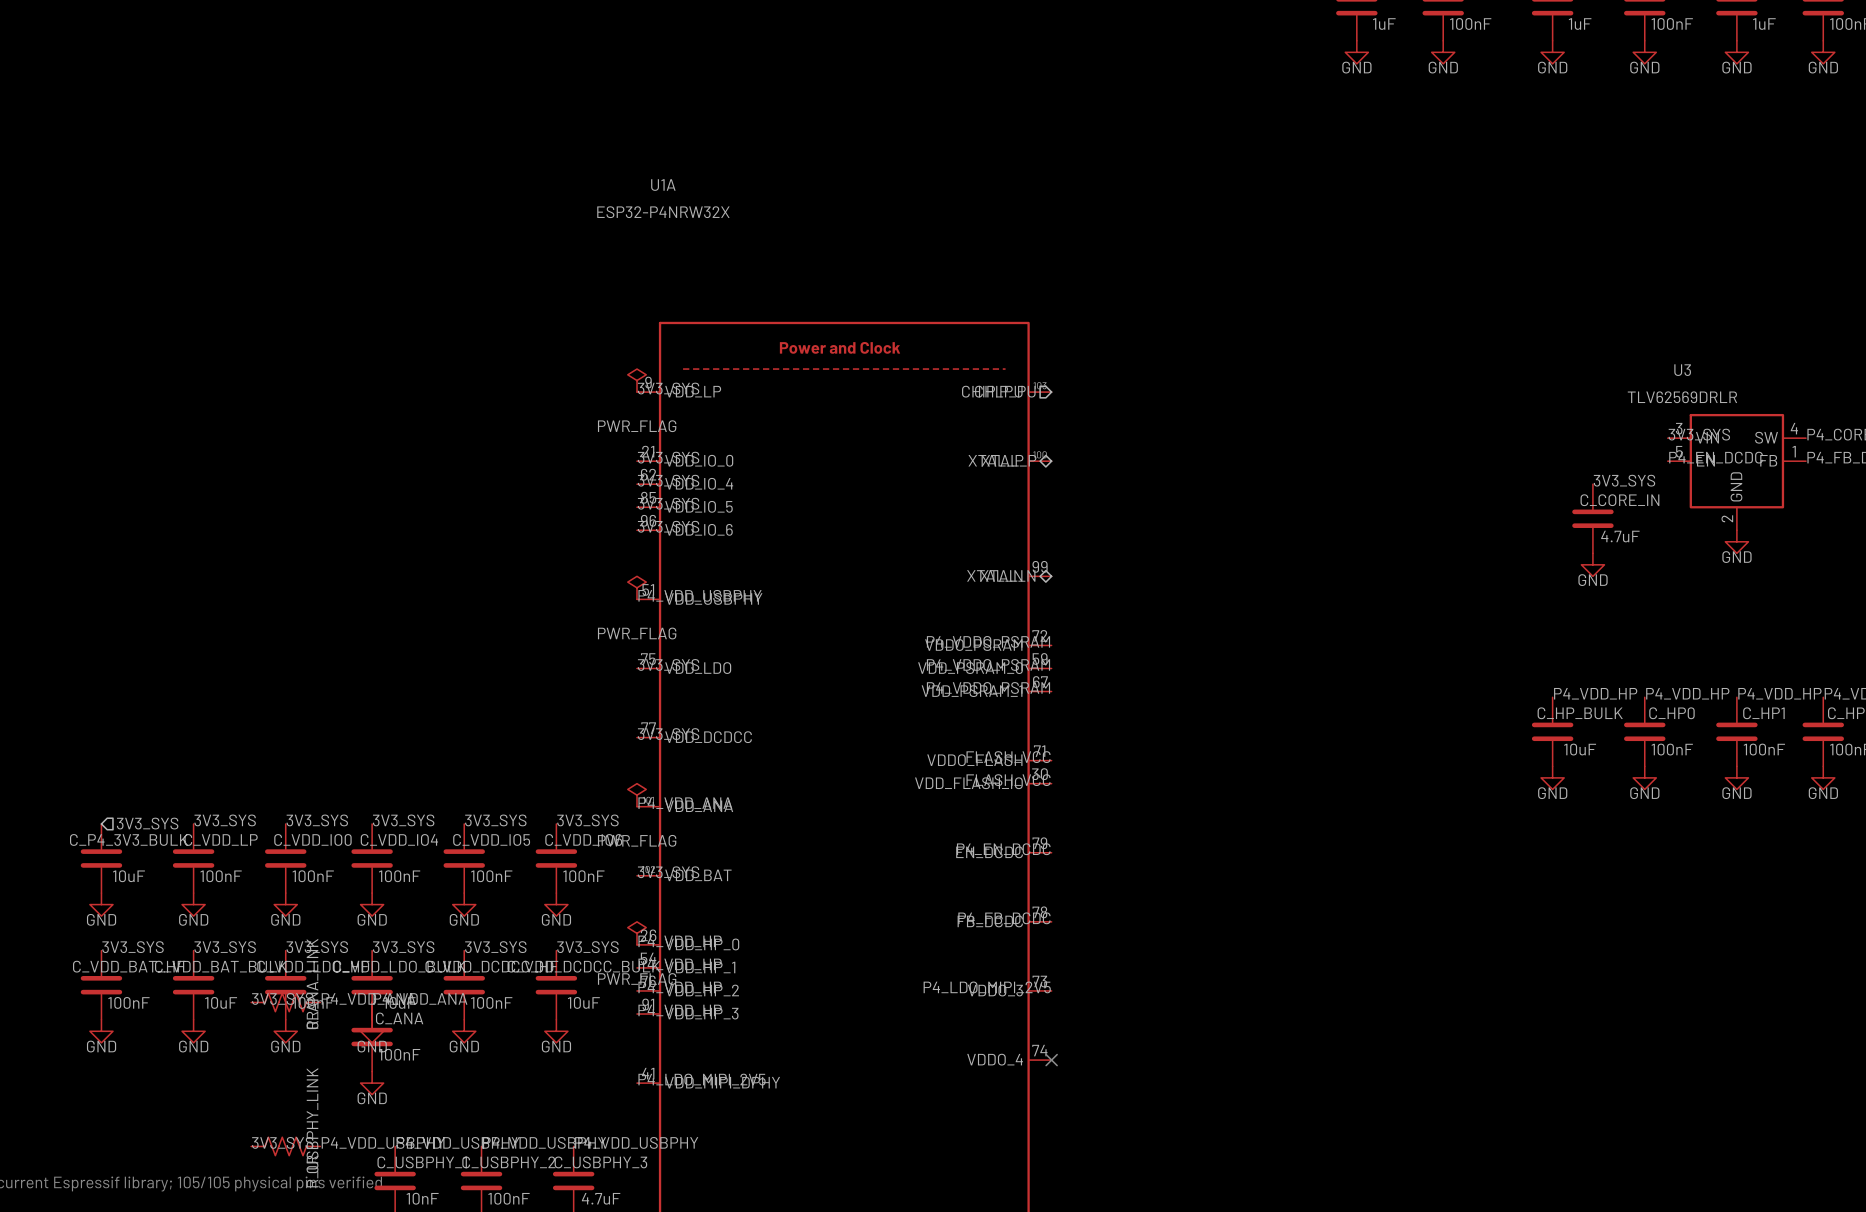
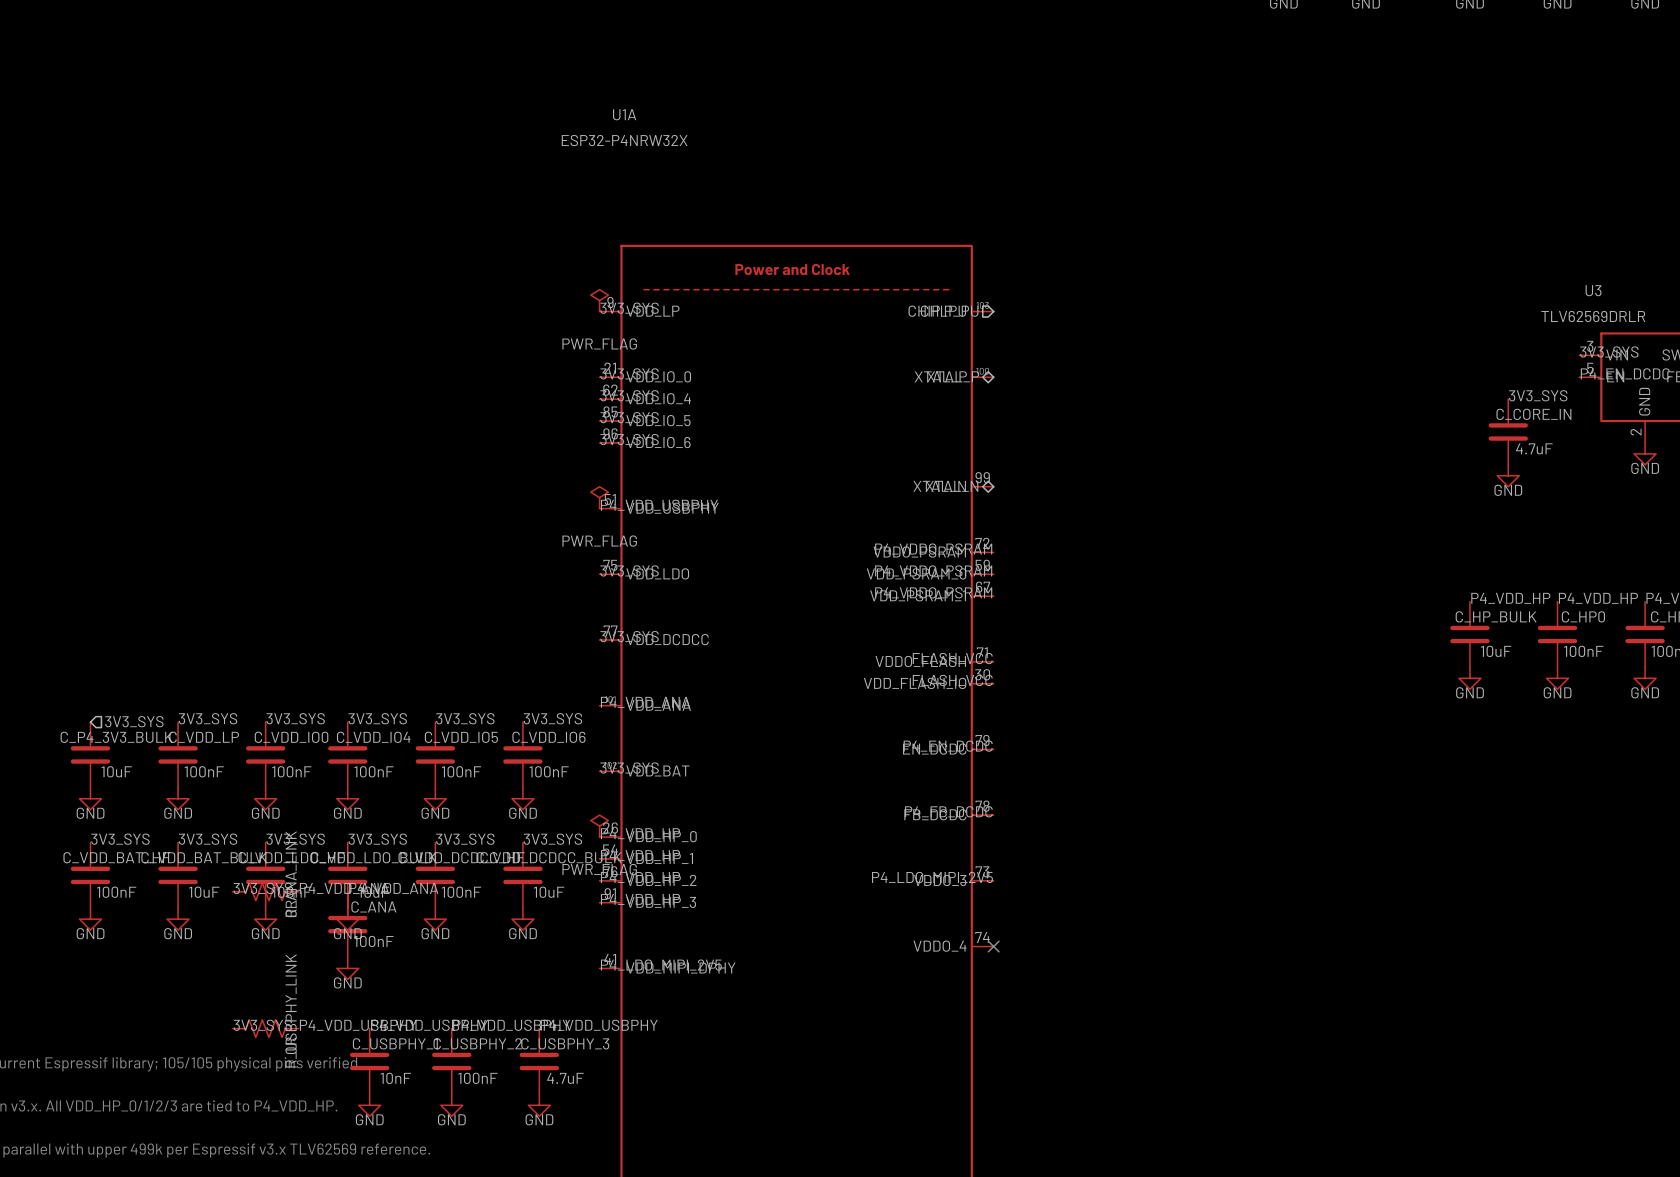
power symbol: PWR_FLAG (637, 795) -> none

